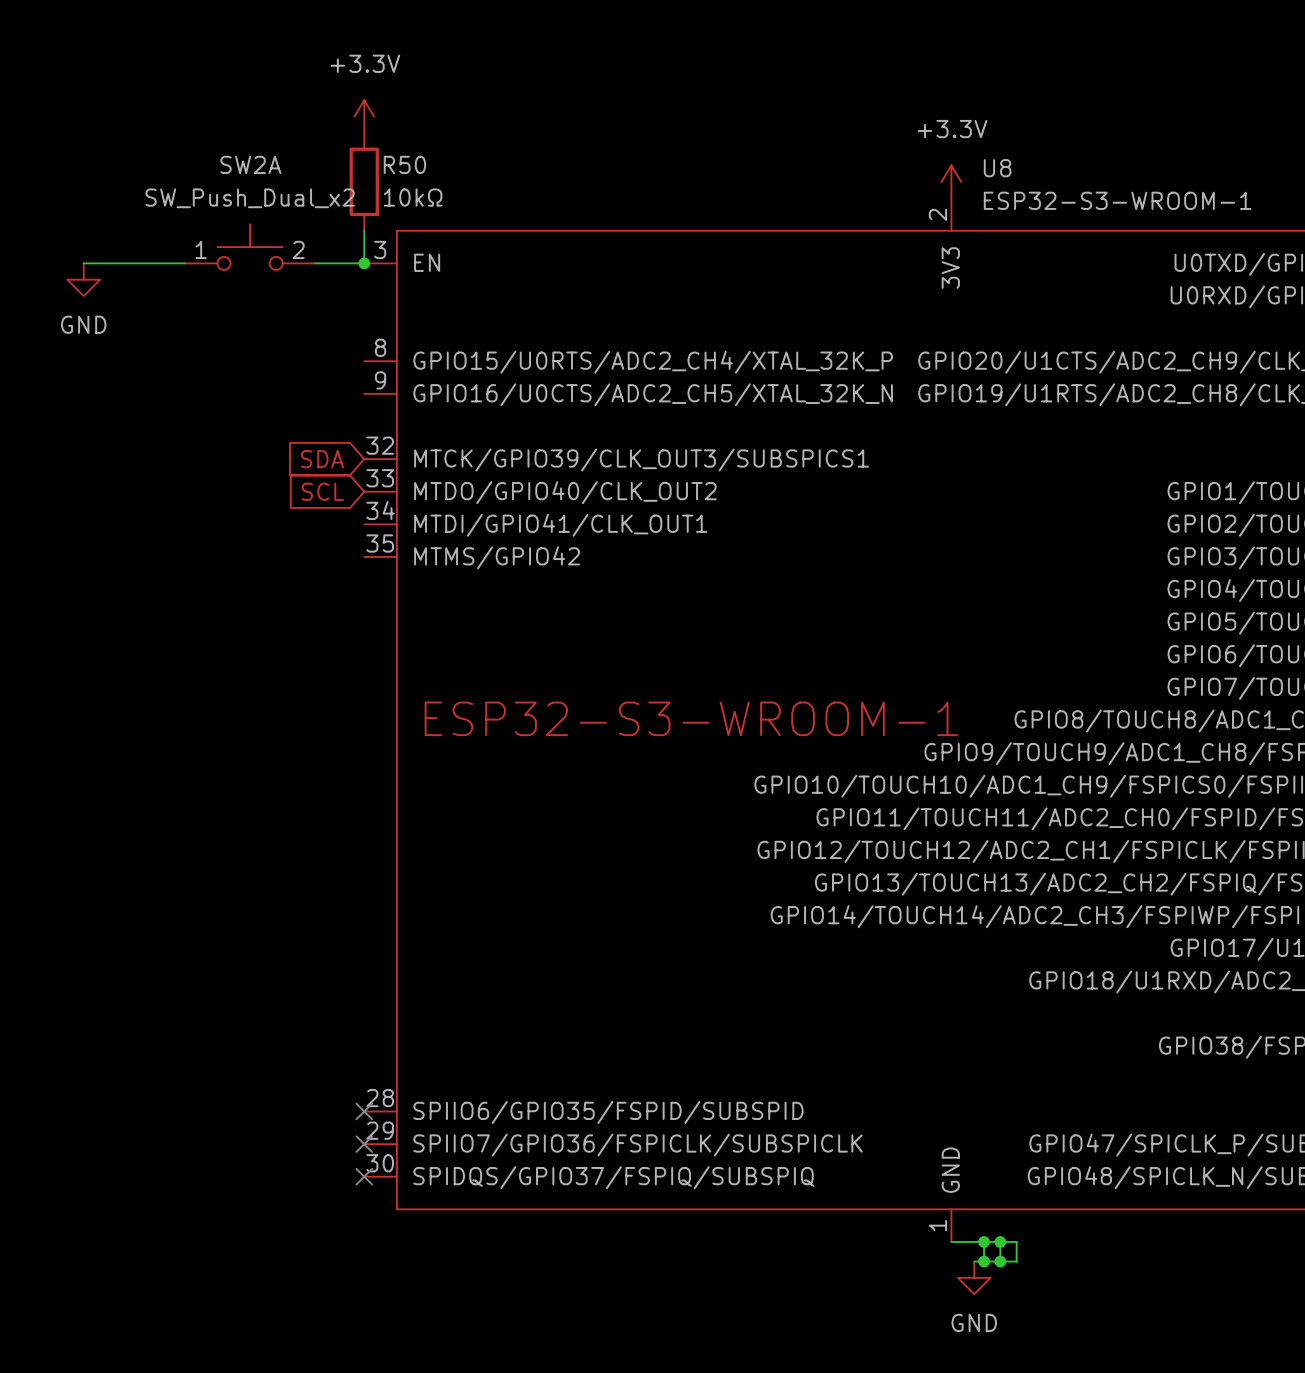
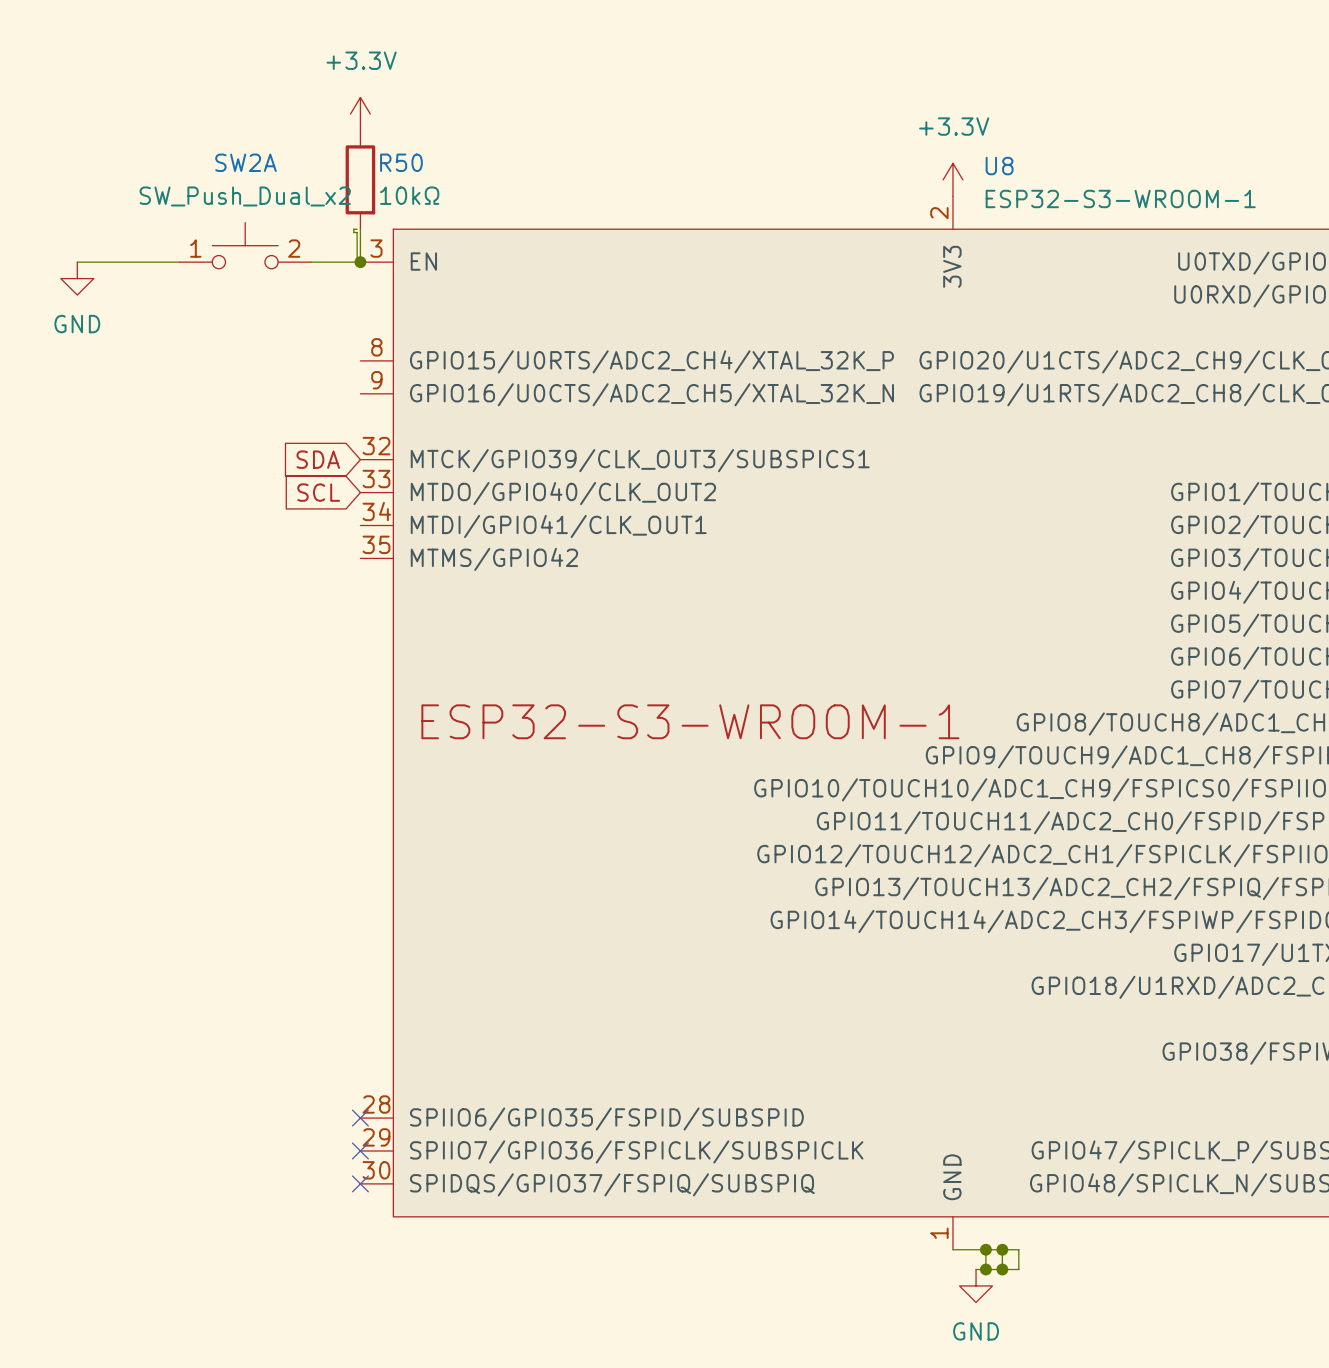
wire: none -> (357, 229) (353, 229) (353, 232) (357, 232) (357, 262)

